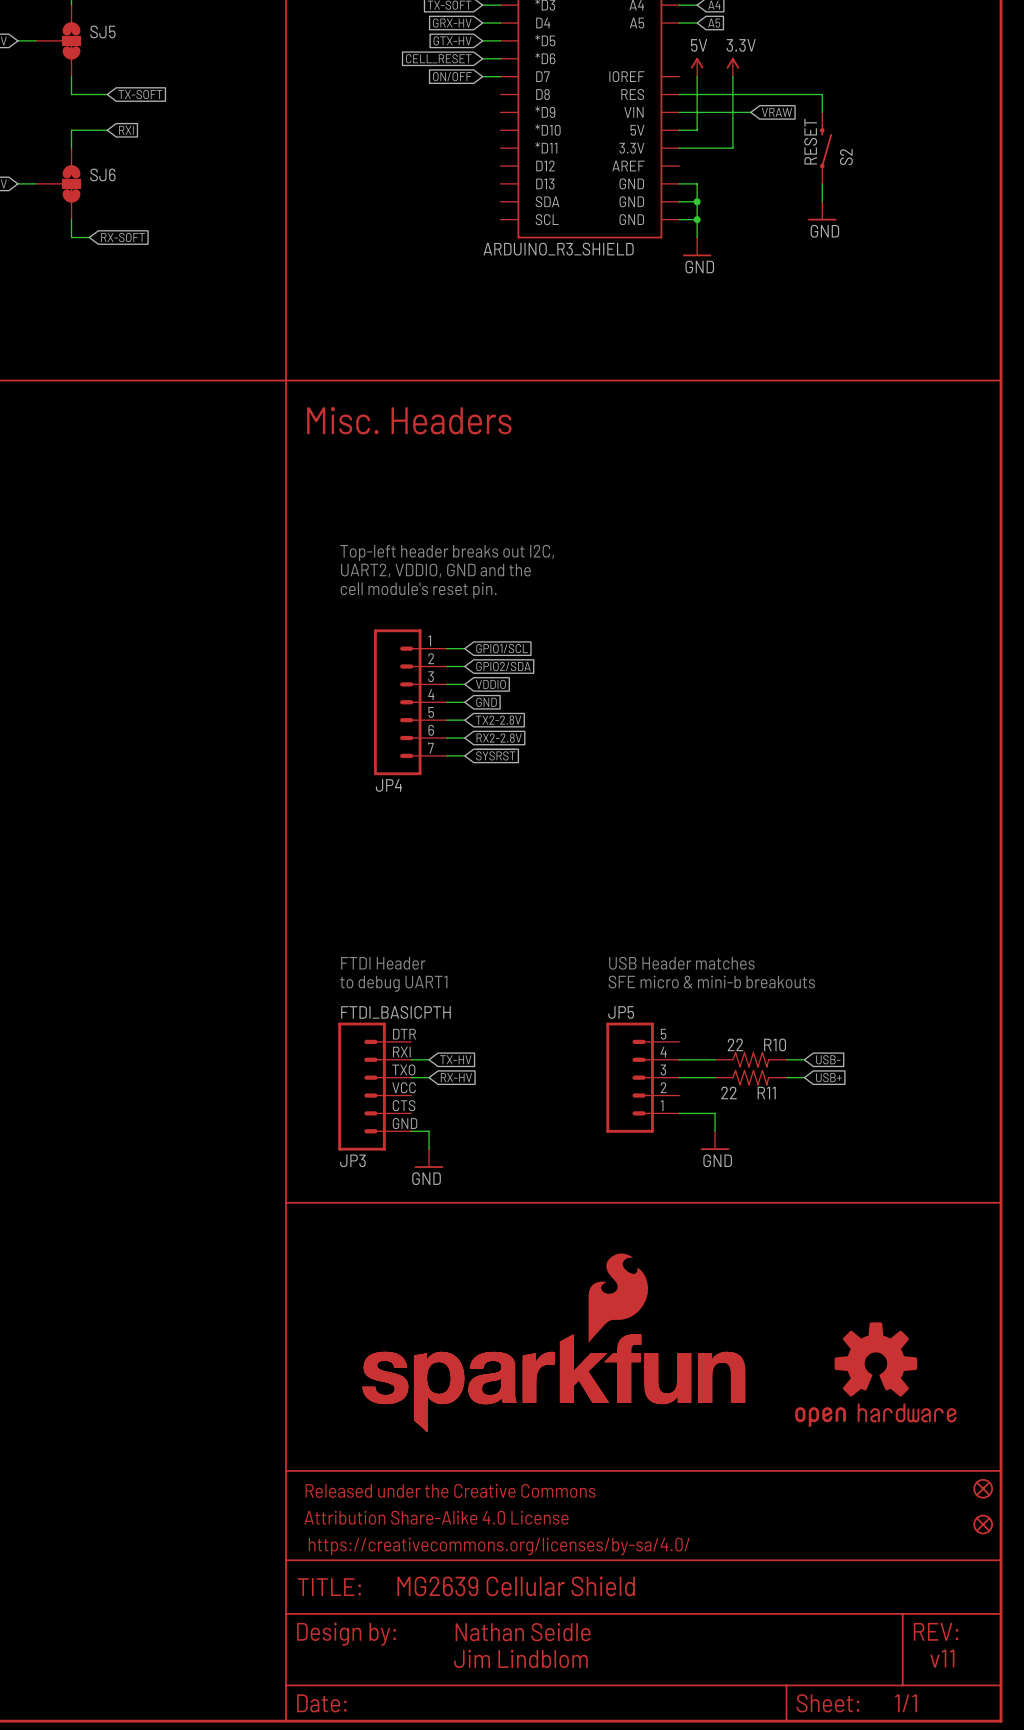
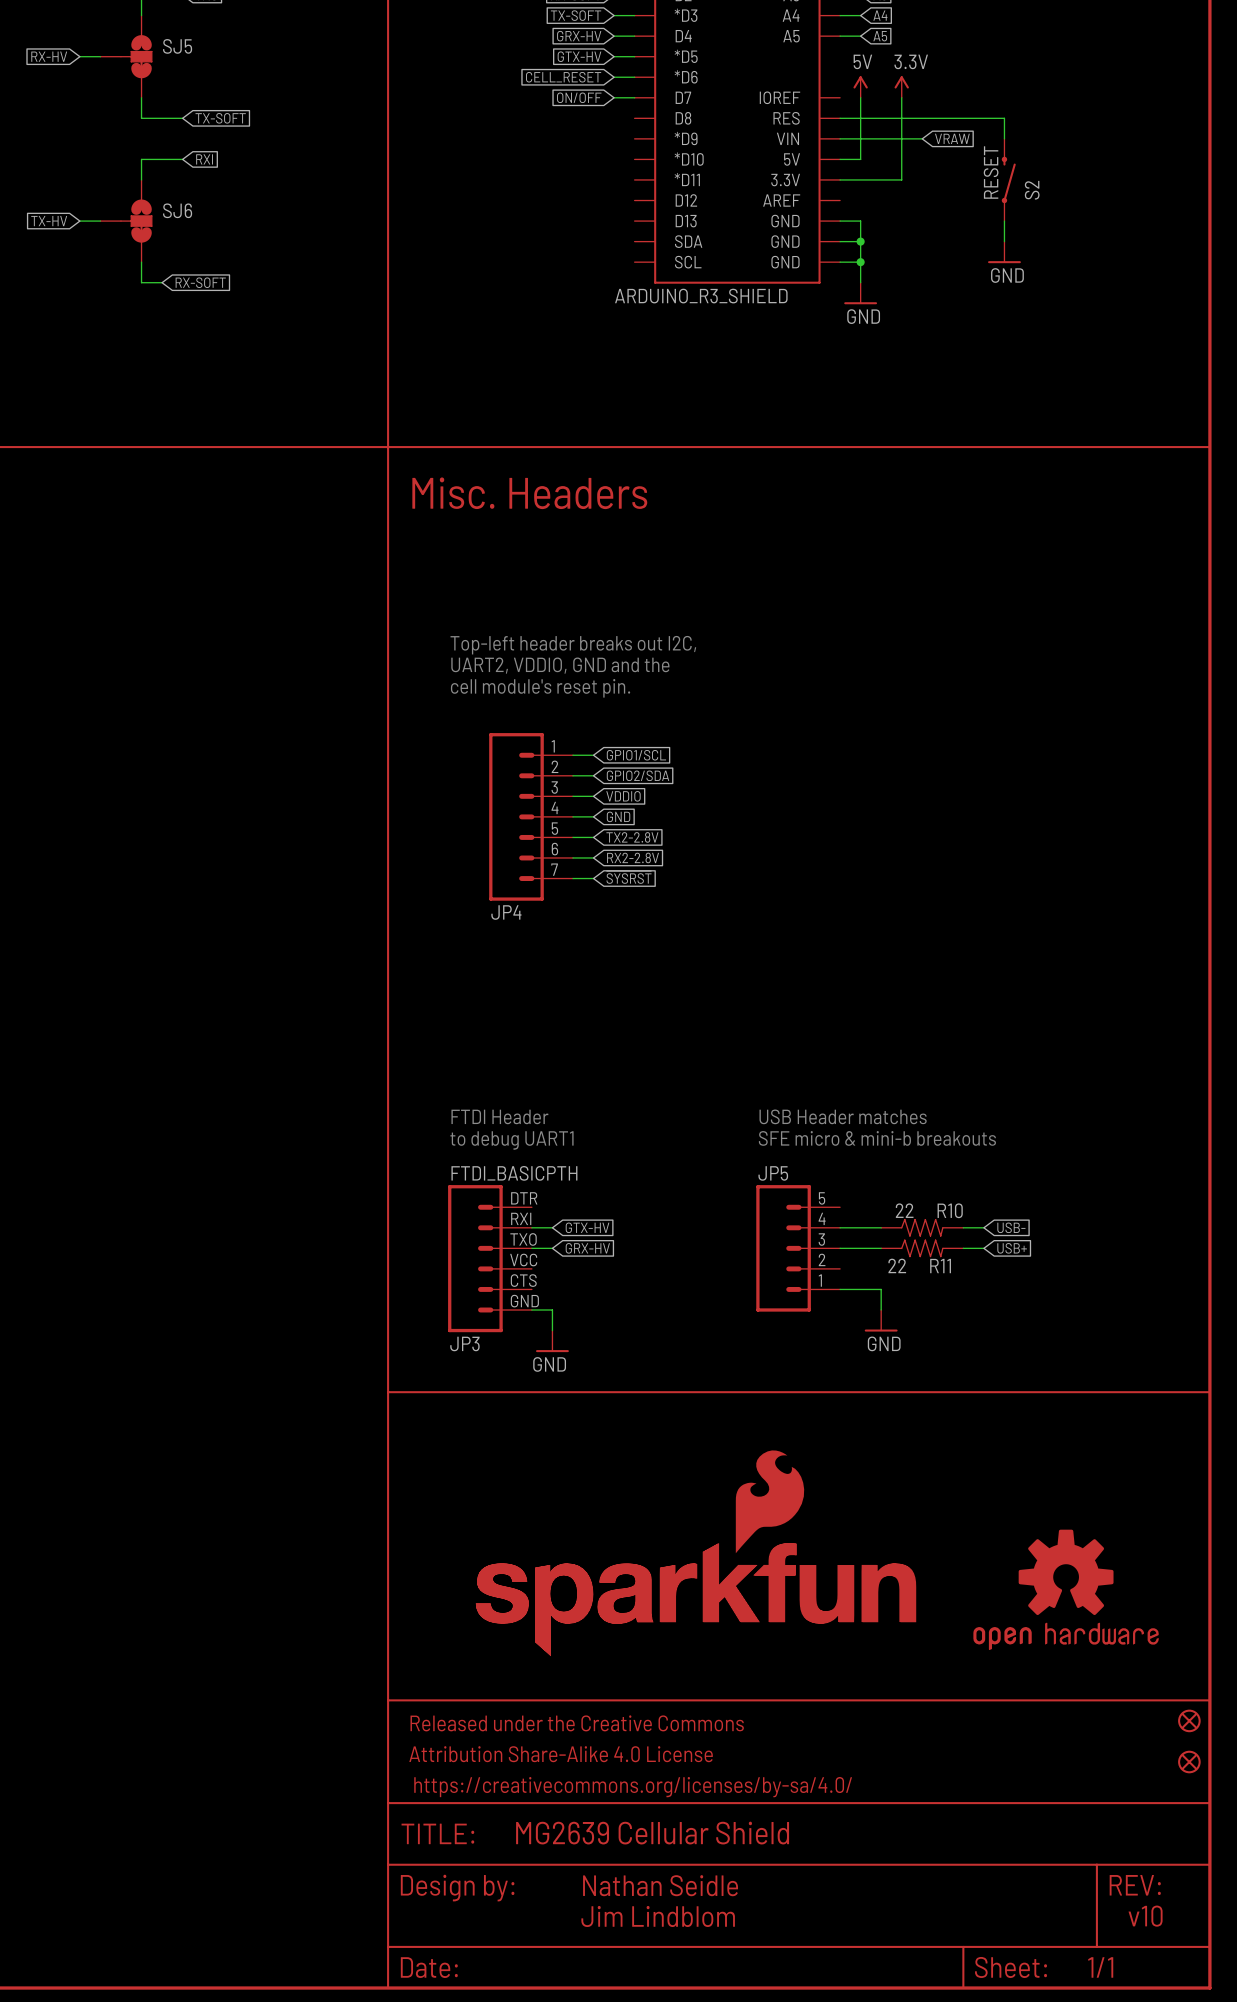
global label: TX-HV (455, 1059) -> GTX-HV (587, 1227)
global label: RX-HV (456, 1077) -> GRX-HV (587, 1248)
text: v11 (942, 1658) -> v10 (1145, 1916)

